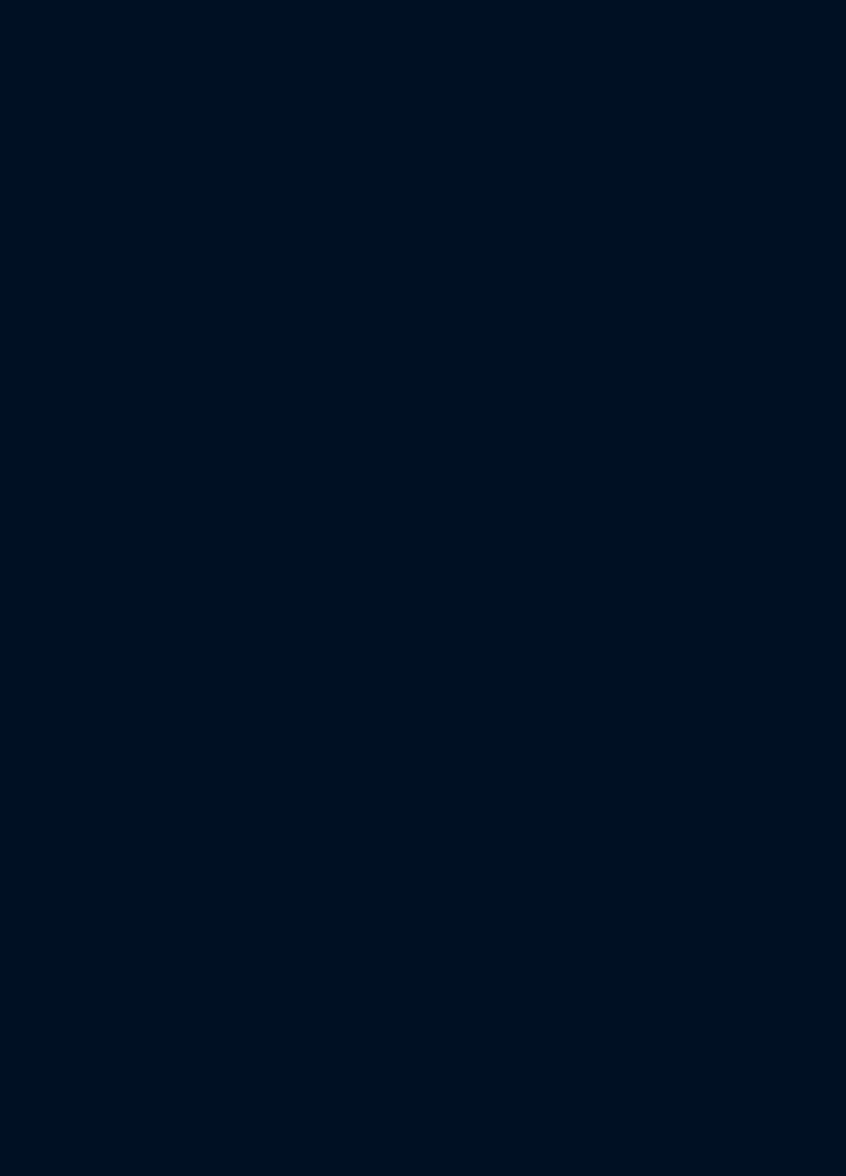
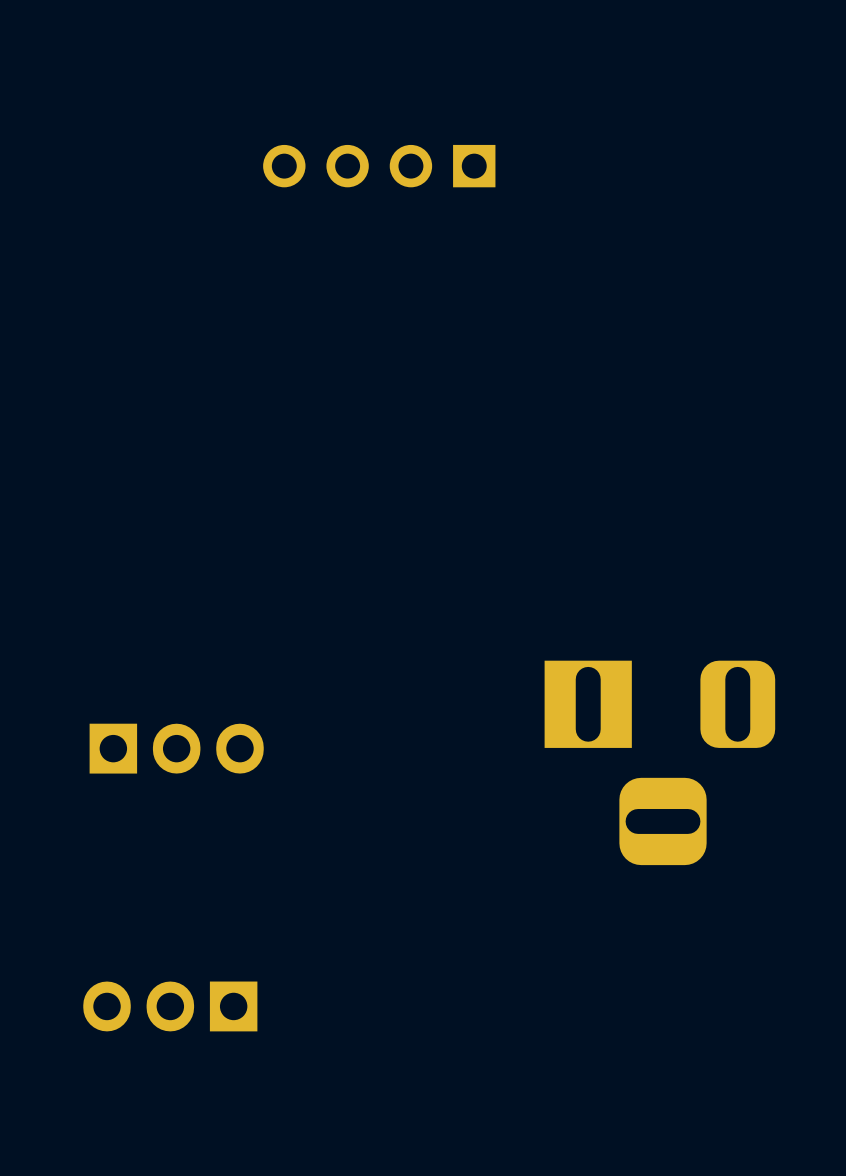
part: none -> (379, 166)
part: none -> (176, 748)
part: none -> (659, 762)
part: none -> (170, 1006)

